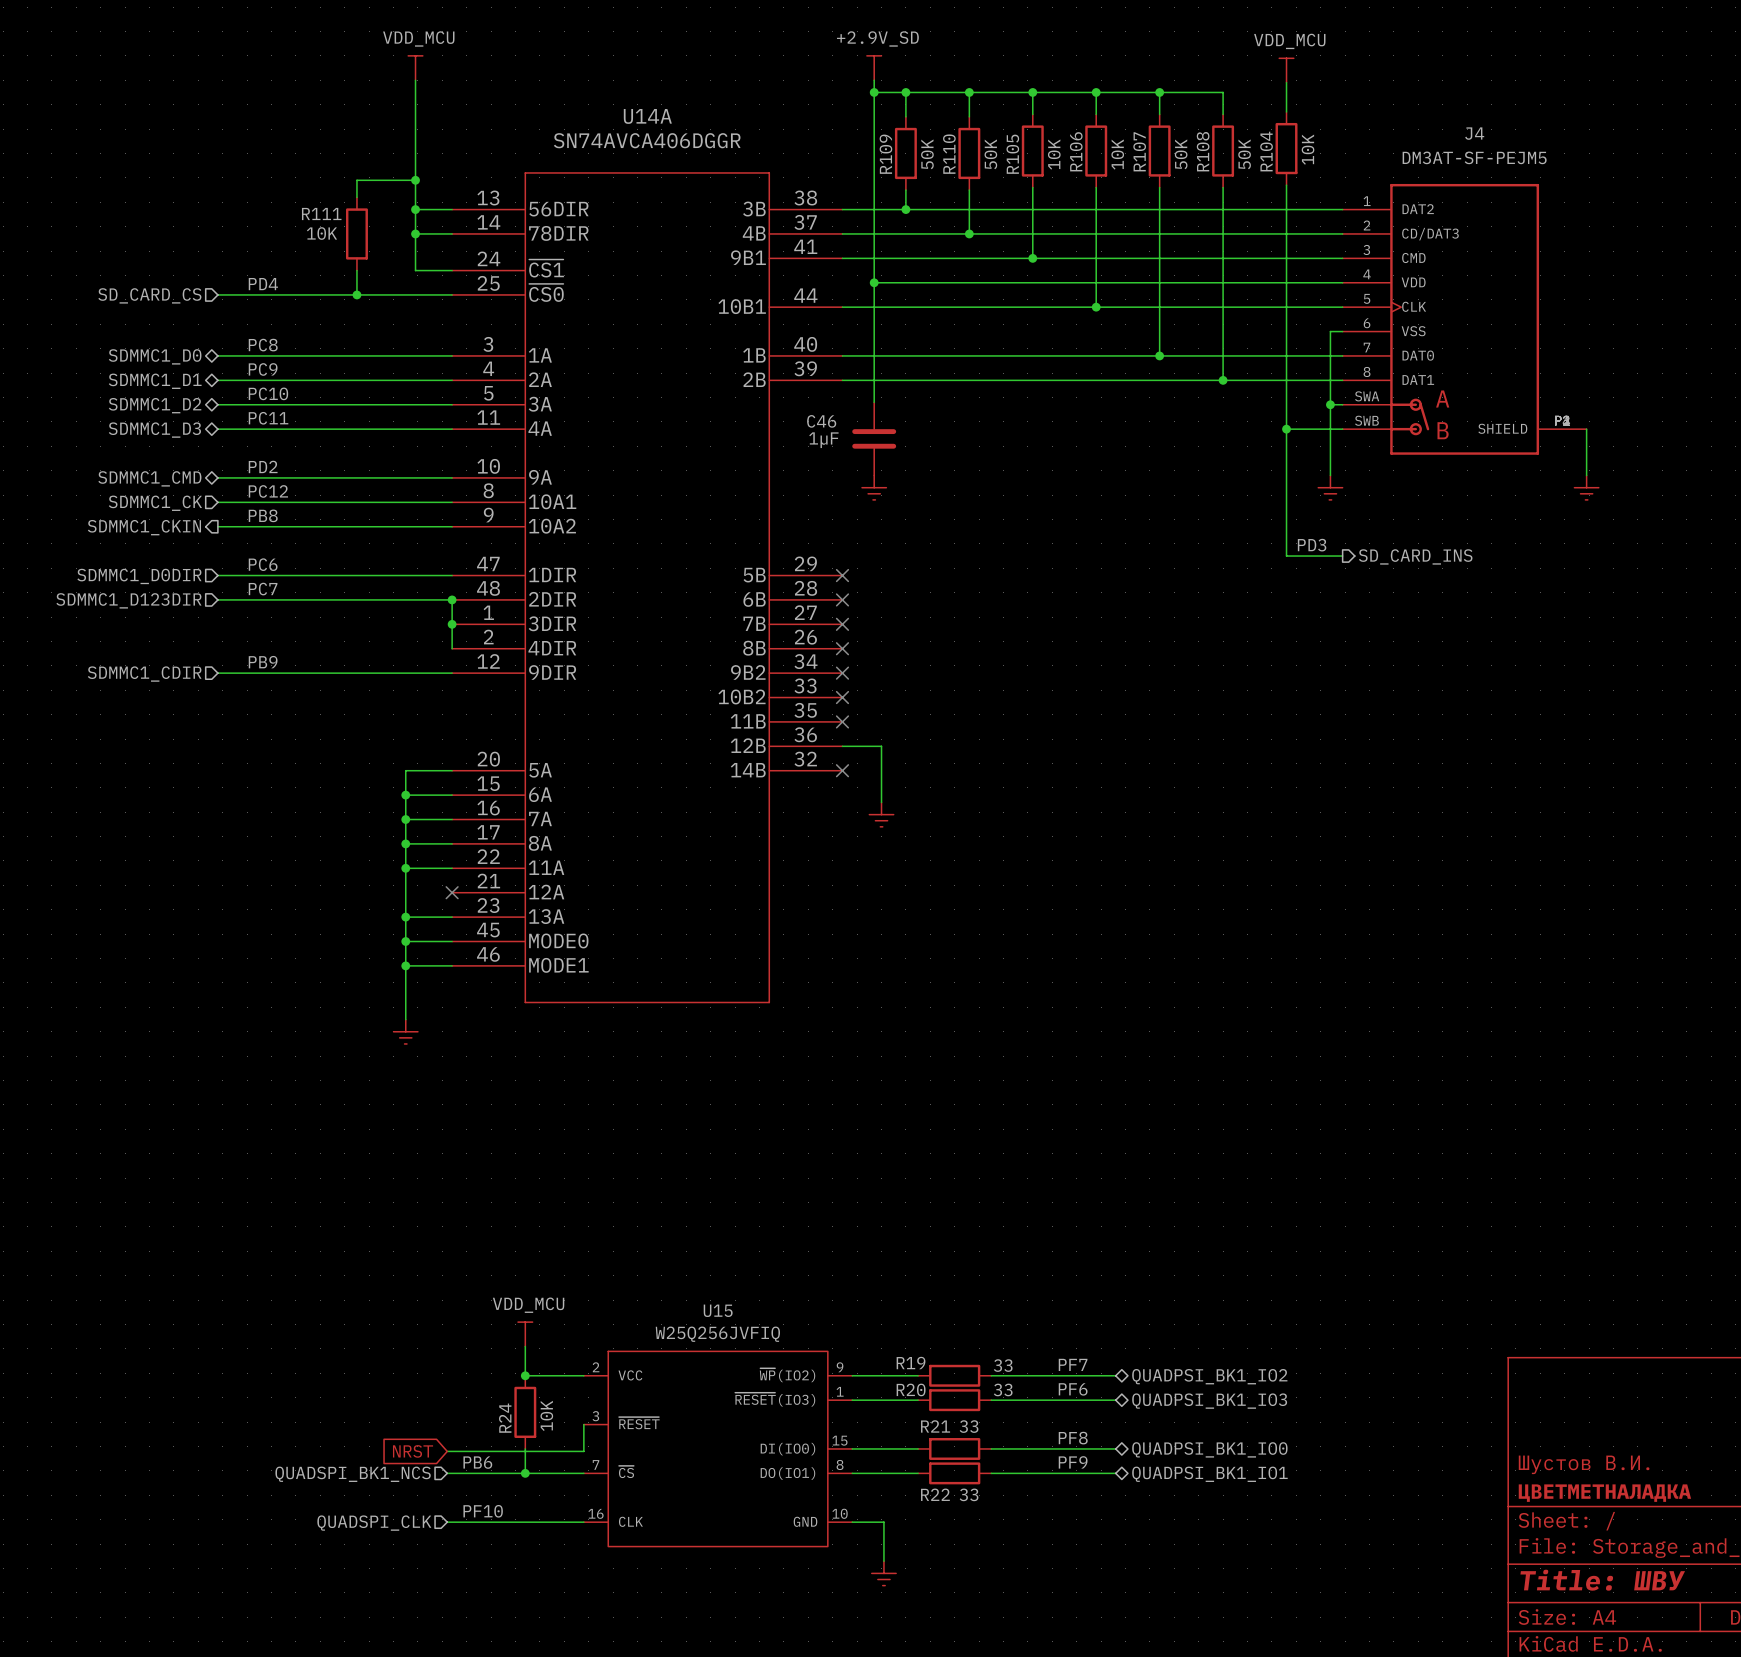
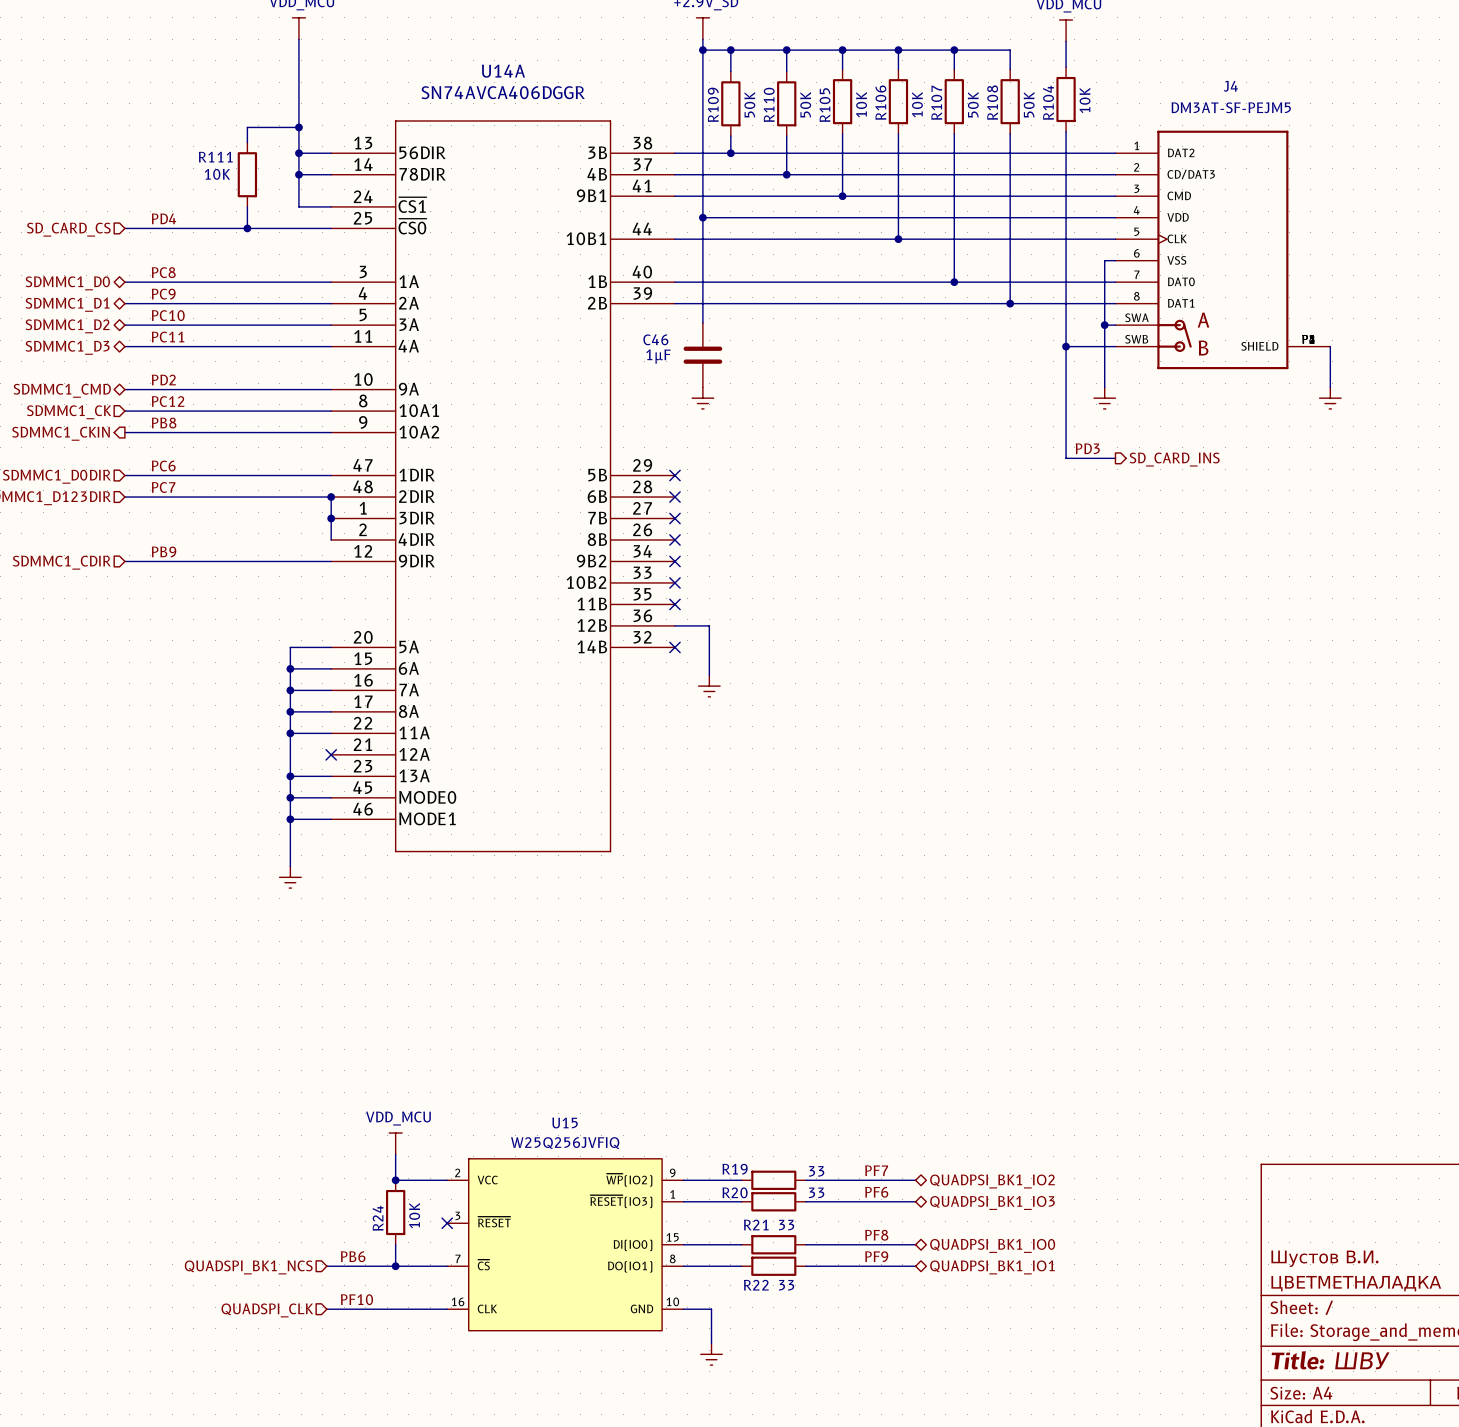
wire: (583, 1424) (583, 1451) (447, 1451) -> none
no-connect mark: none -> (447, 1223)
global label: NRST (413, 1451) -> none

